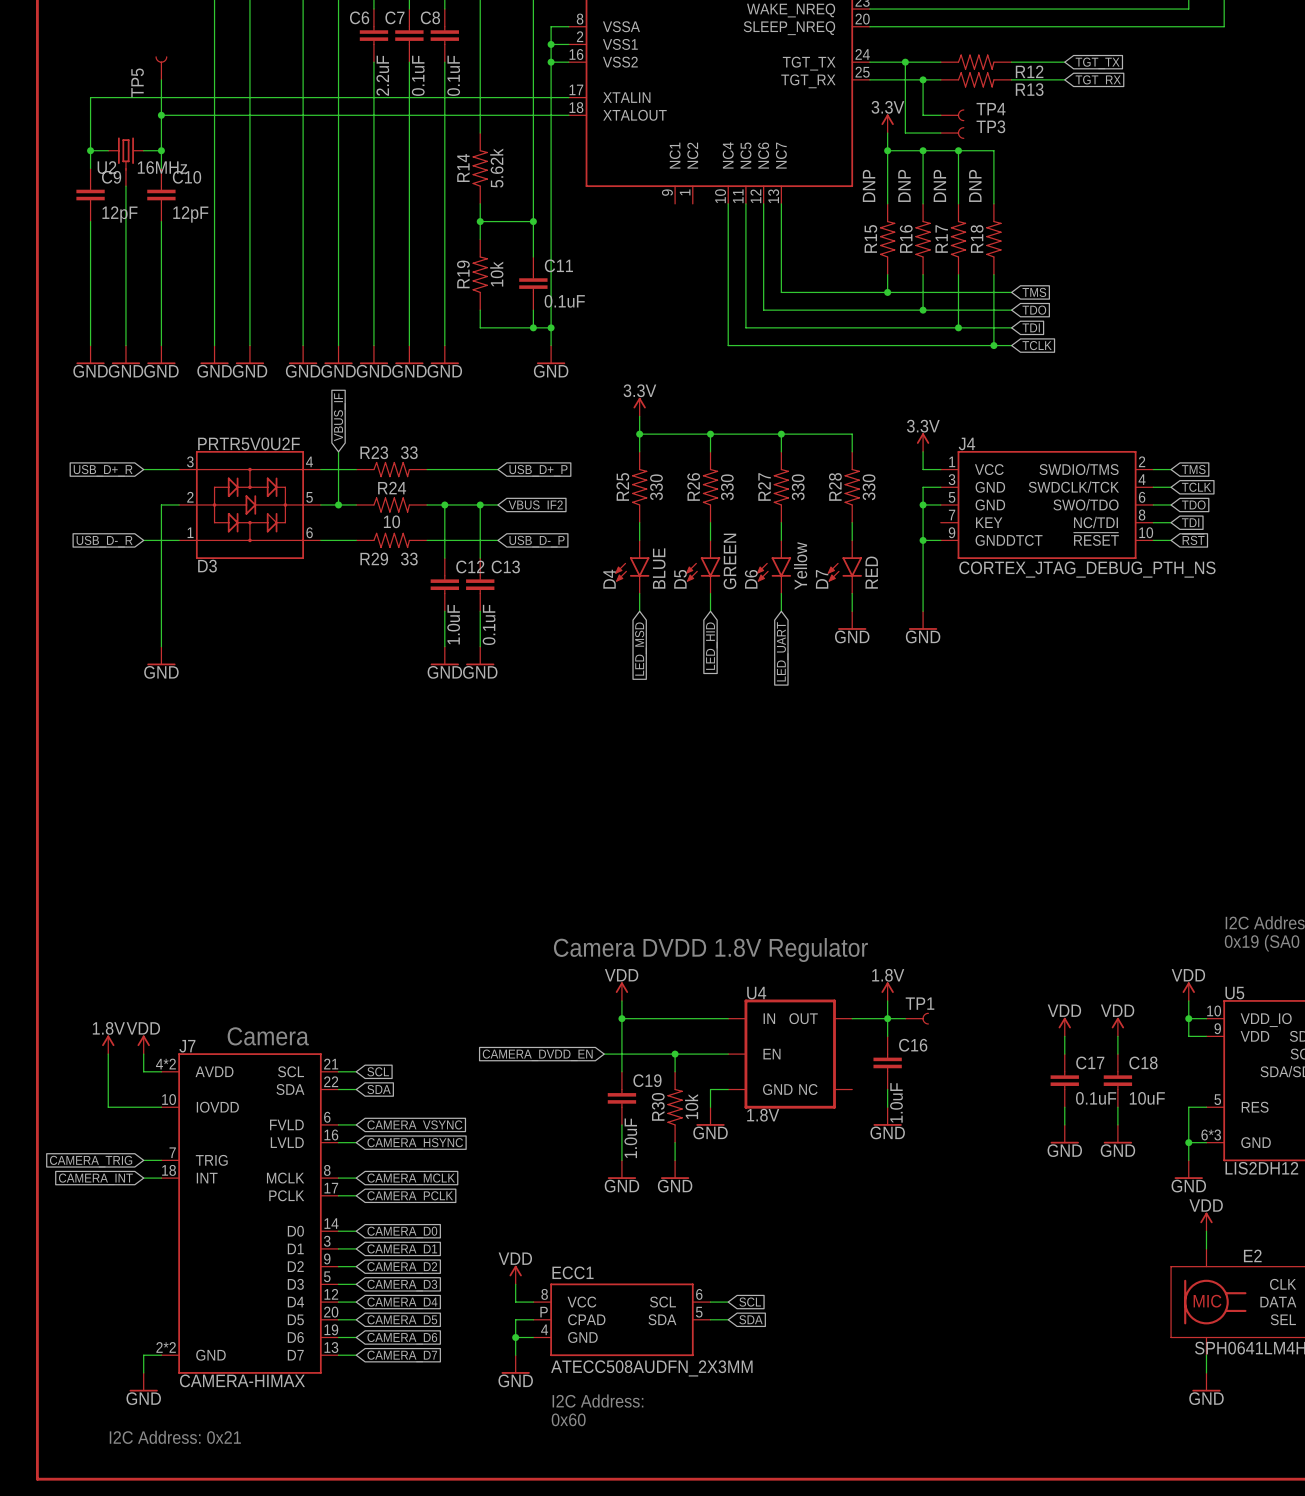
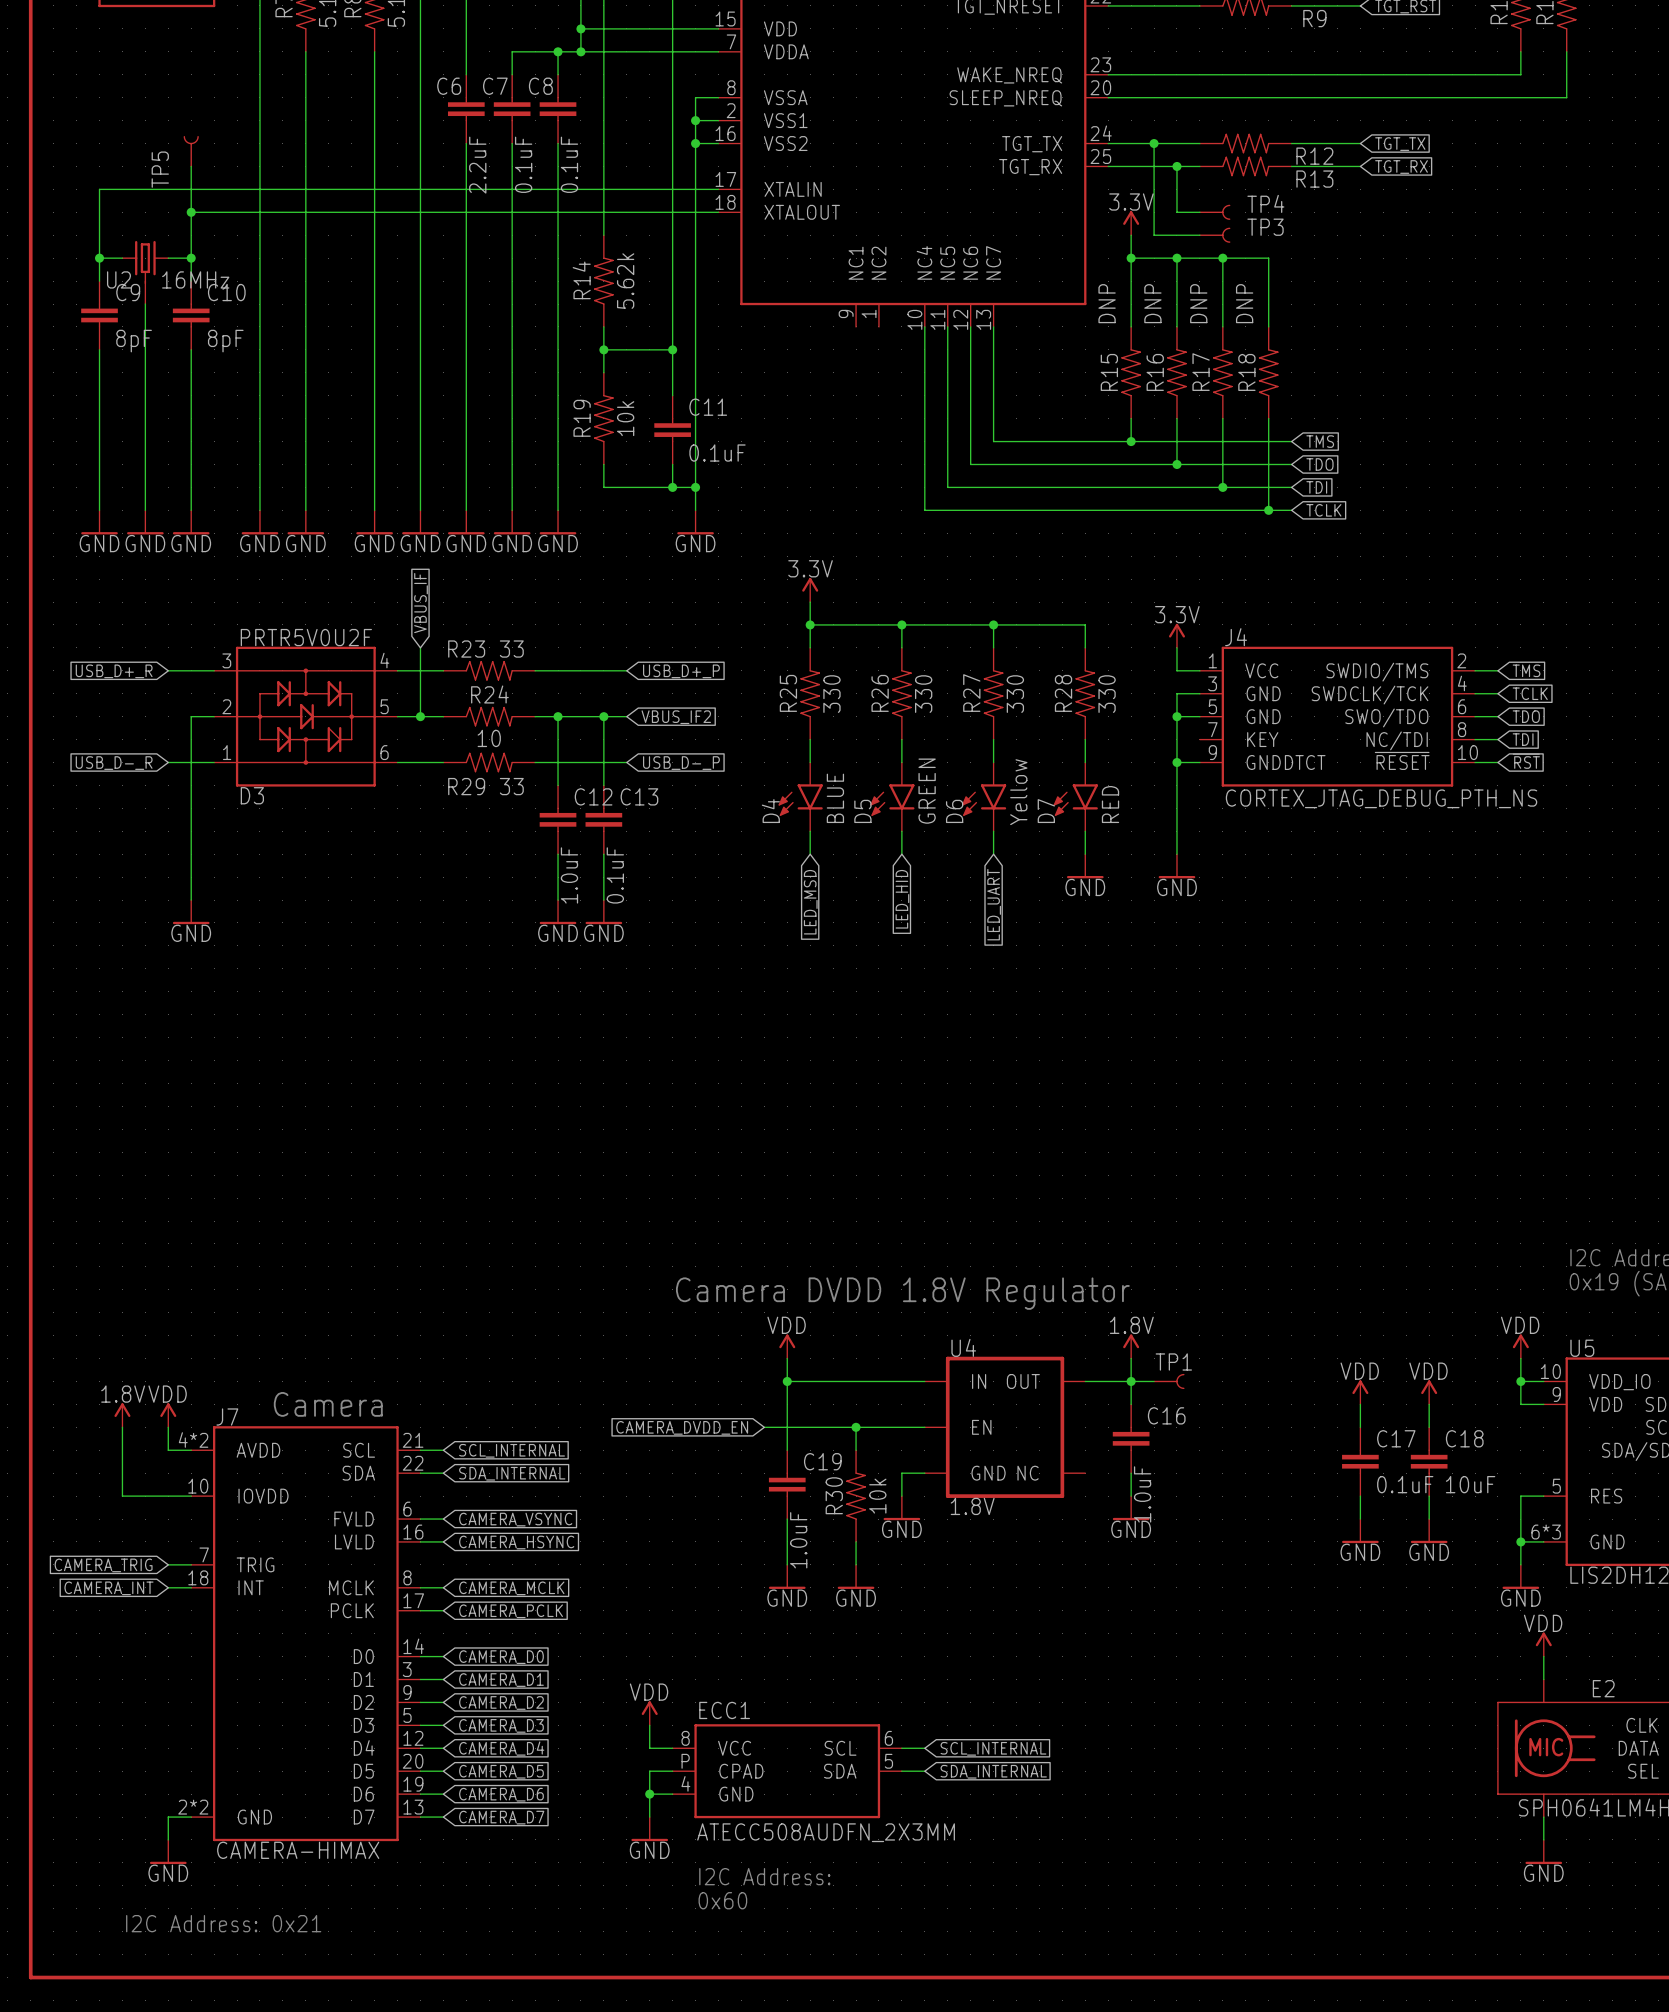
C9 value: 12pF (119, 214) -> 8pF (134, 341)
C10 value: 12pF (190, 214) -> 8pF (225, 341)
global label: SCL (378, 1071) -> SCL_INTERNAL (512, 1450)
global label: SDA (379, 1089) -> SDA_INTERNAL (512, 1473)
global label: SCL (750, 1302) -> SCL_INTERNAL (993, 1748)
global label: SDA (751, 1319) -> SDA_INTERNAL (993, 1771)

